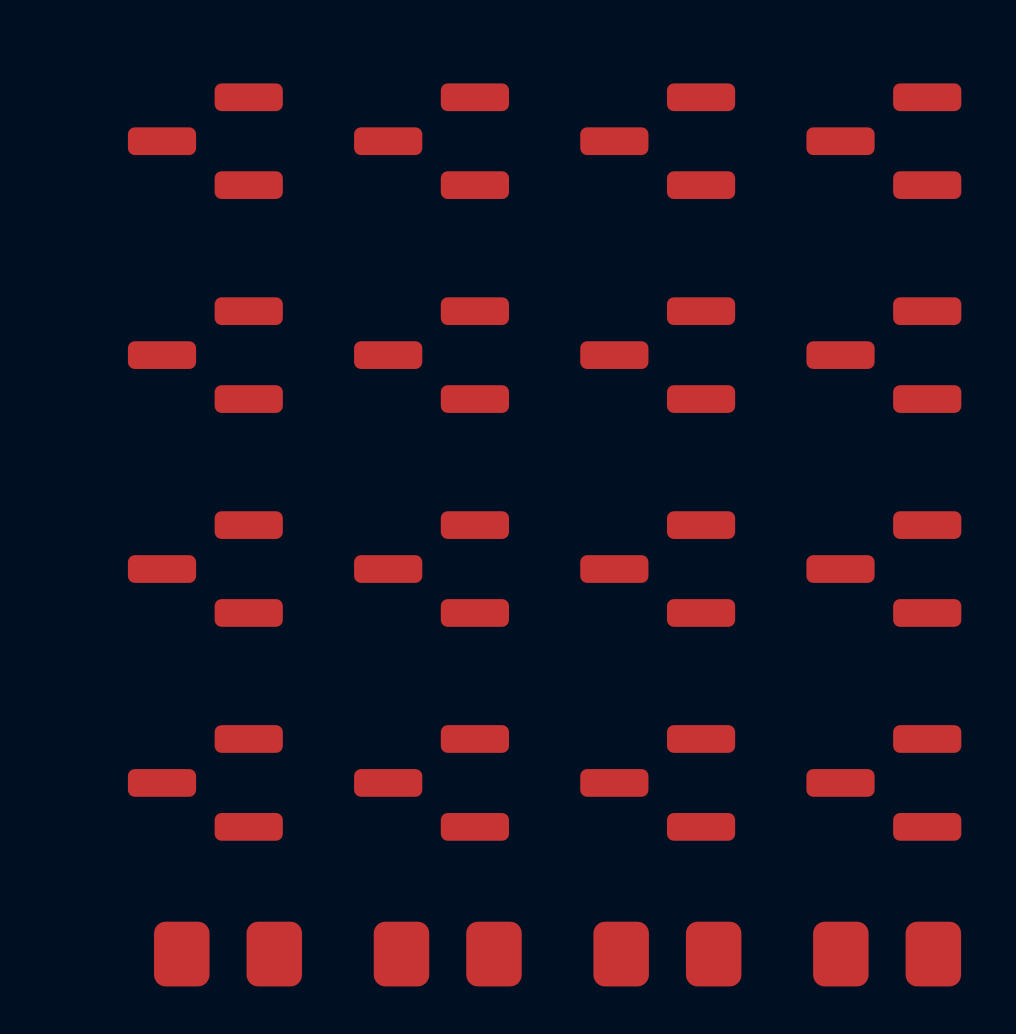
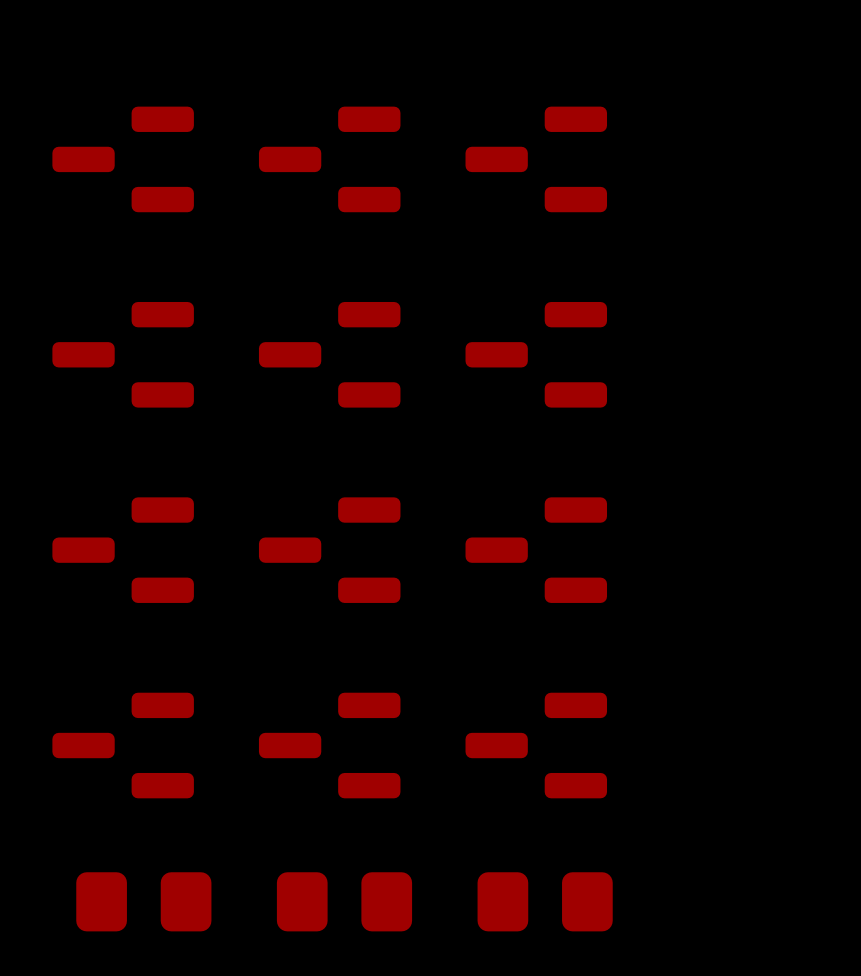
part: (883, 141) -> none
part: (883, 355) -> none
part: (883, 569) -> none
part: (883, 782) -> none
part: (887, 954) -> none

